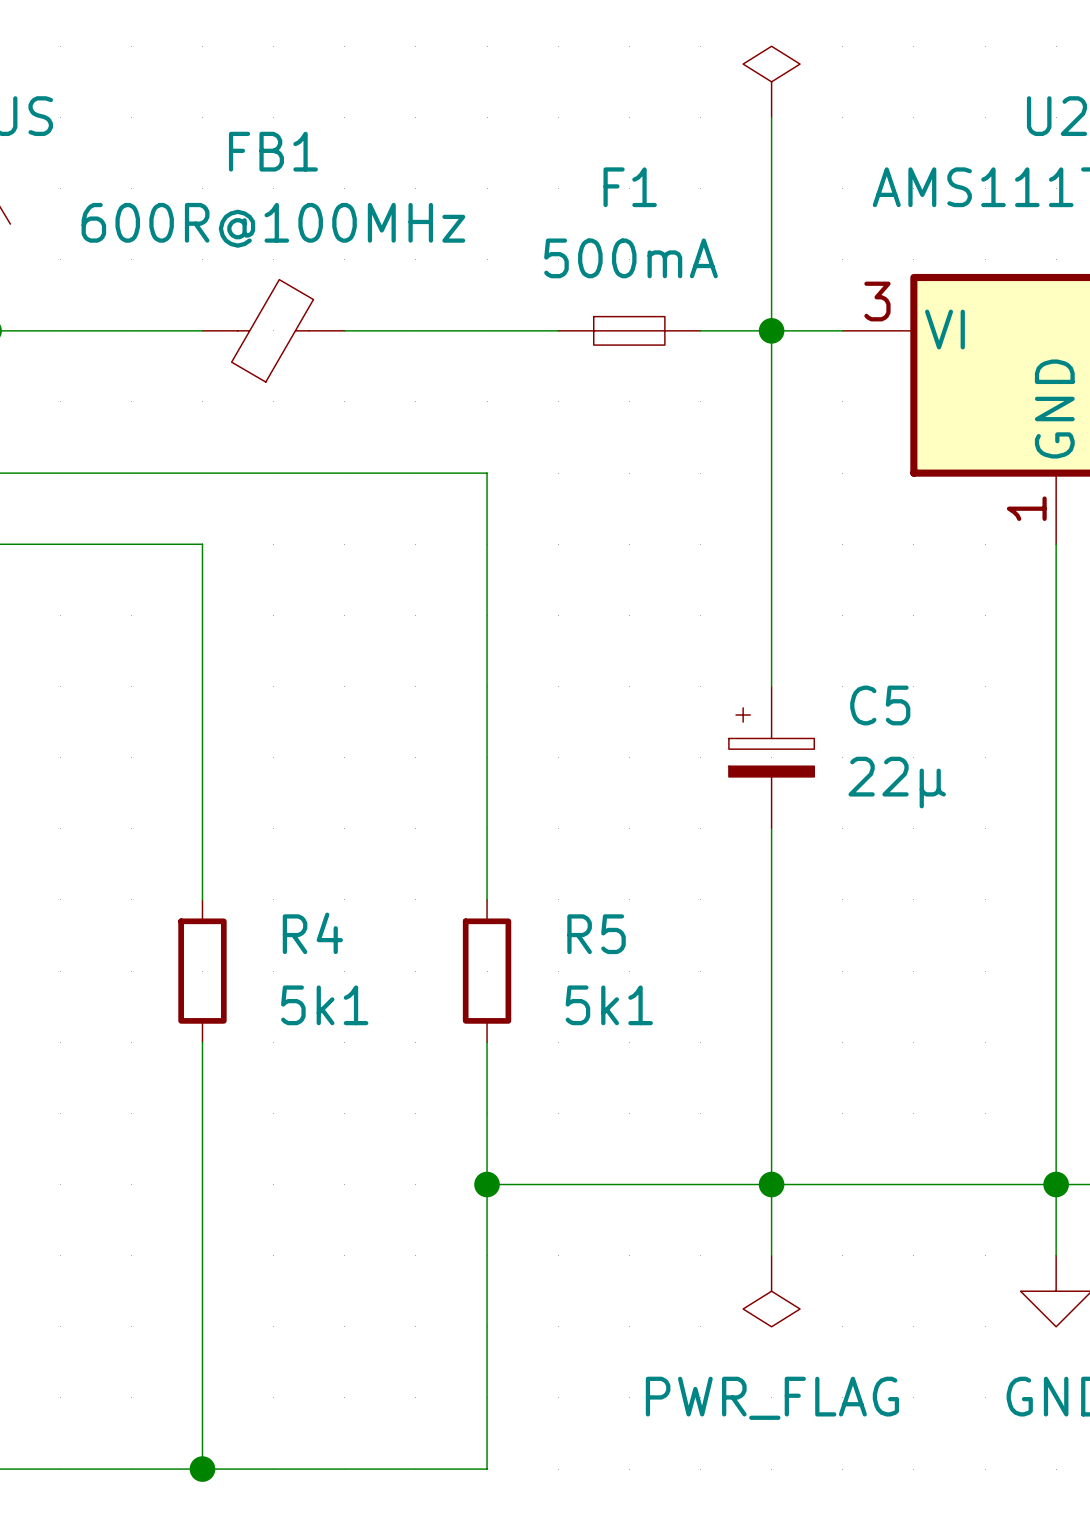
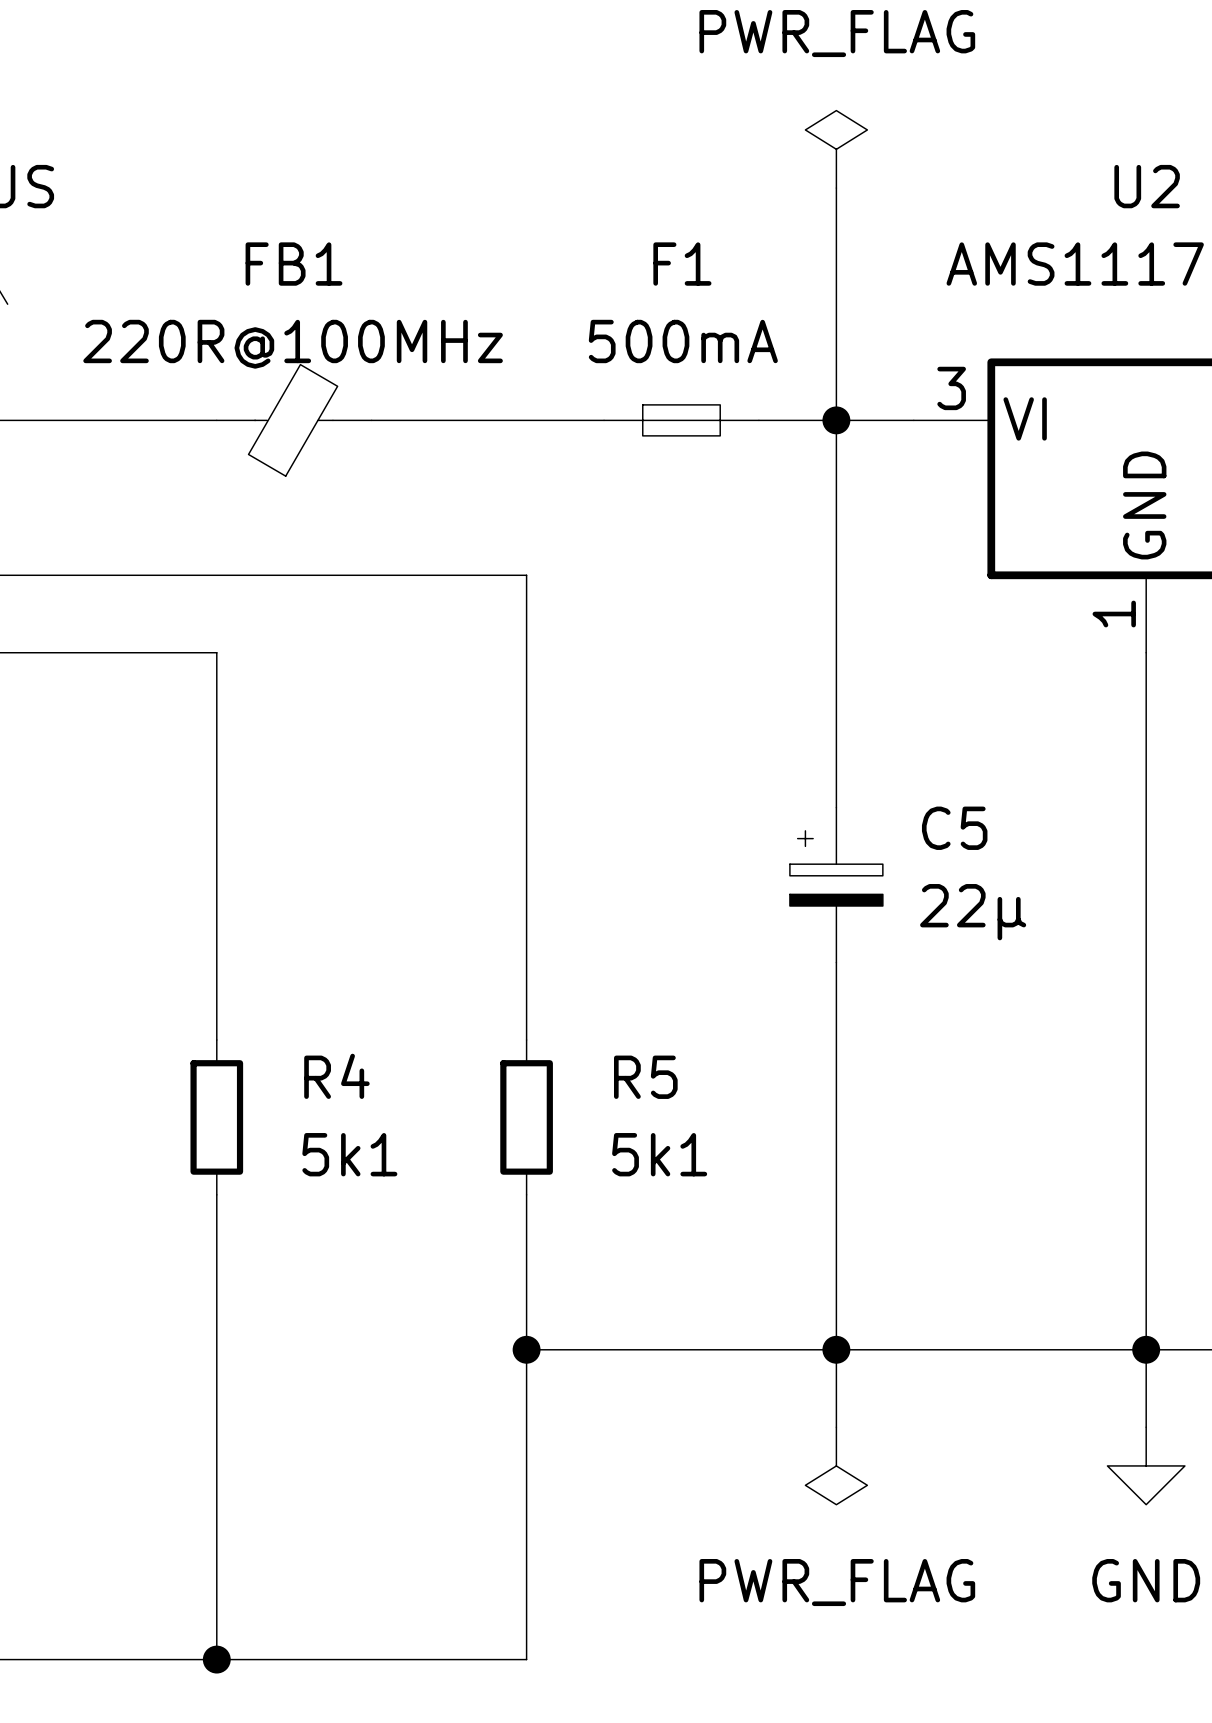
FB1 name position: FB1 (273, 151) -> FB1 (294, 264)
FB1 value: 600R@100MHz (273, 225) -> 220R@100MHz (293, 344)

